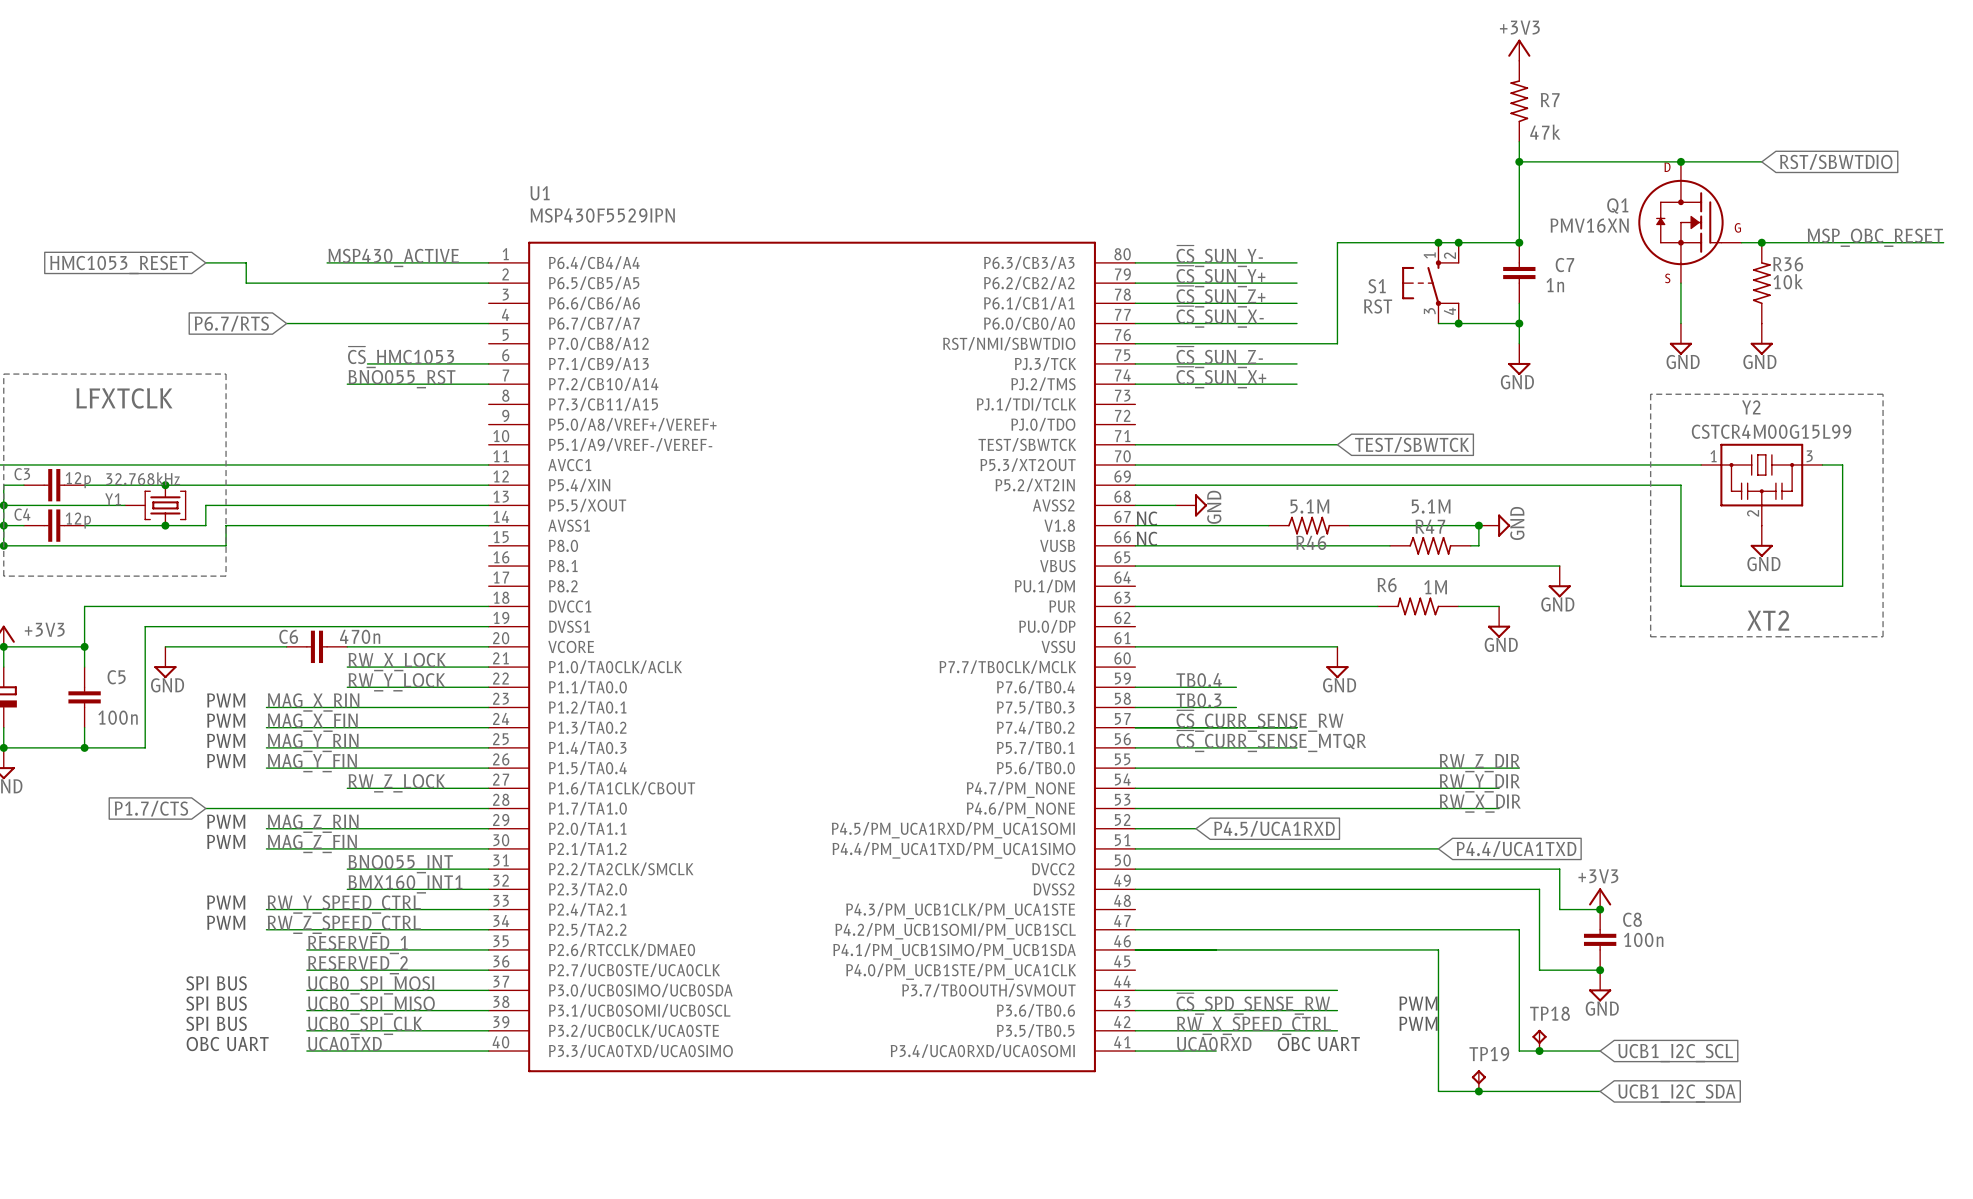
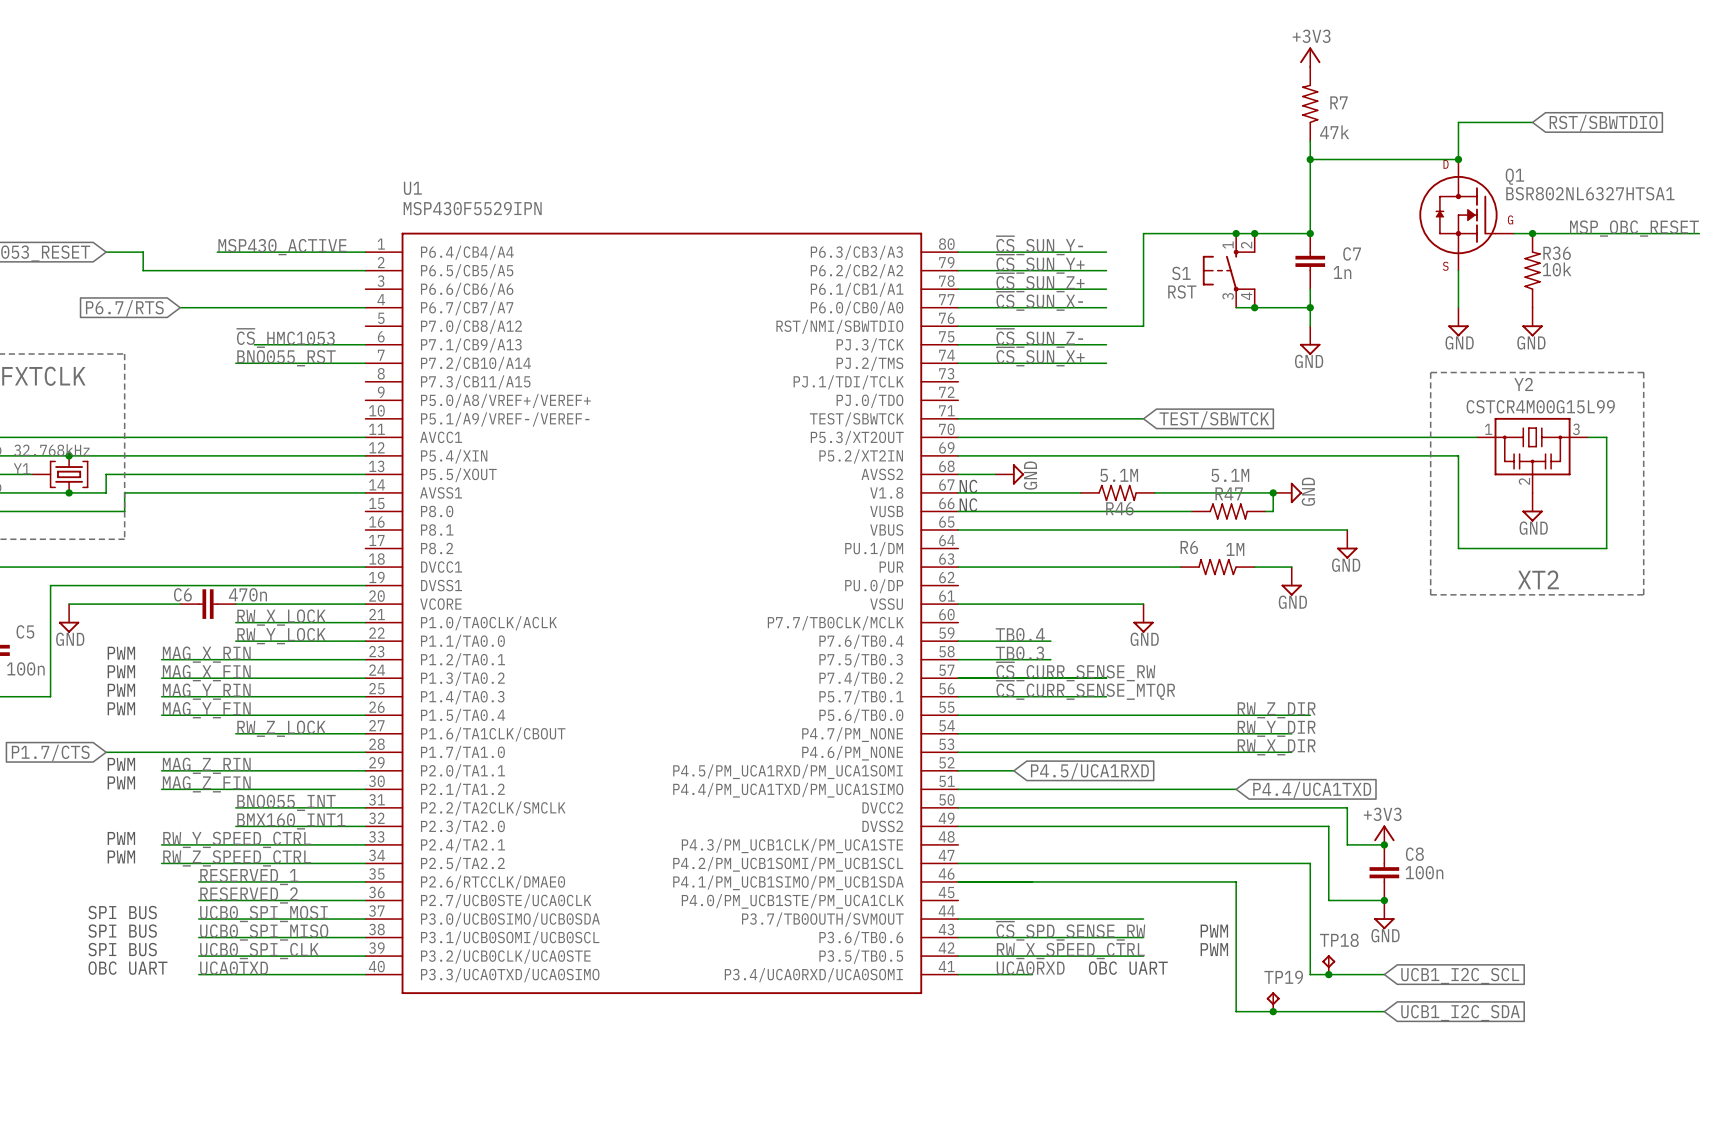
wire: (1680, 161) (1761, 161) -> (1458, 159) (1458, 122) (1532, 122)
global label position: RST/SBWTDIO (1836, 161) -> RST/SBWTDIO (1603, 123)
Q1 name position: Q1 (1617, 206) -> Q1 (1514, 176)
Q1 value: PMV16XN (1589, 225) -> BSR802NL6327HTSA1 (1590, 193)

